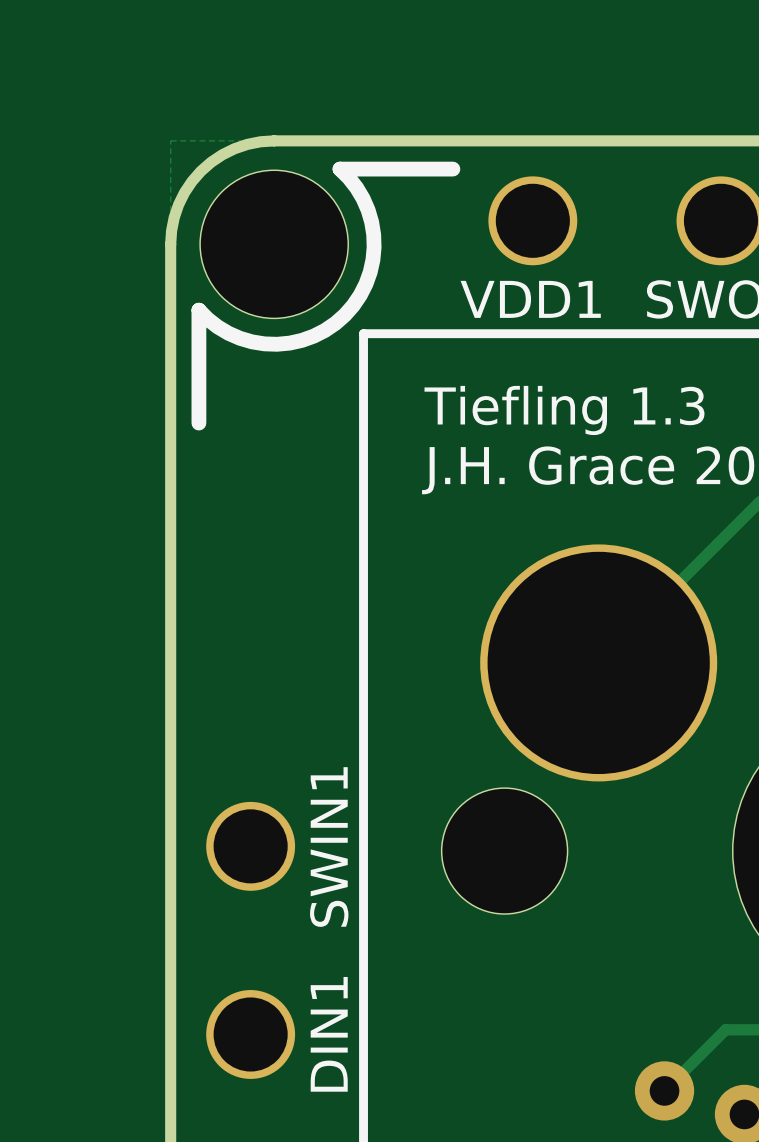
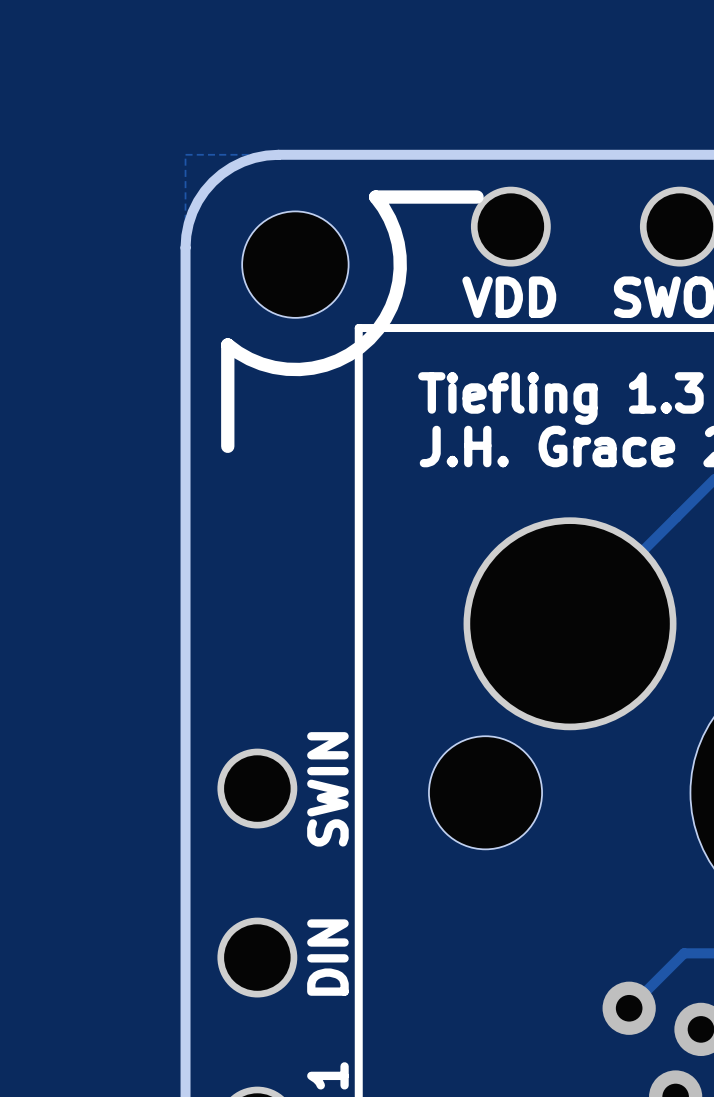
line: (452, 169) (340, 169) (356, 187) (363, 198) (371, 222) (373, 234) (372, 259) (370, 272) (360, 295) (344, 315) (325, 330) (301, 340) (277, 344) (252, 341) (228, 333) (217, 326) (198, 310) (198, 423) -> none
part footprint: [200, 170, 349, 319] -> [242, 211, 349, 318]
line: none -> (477, 197) (375, 197) (389, 218) (394, 230) (399, 256) (400, 269) (395, 294) (385, 318) (378, 329) (359, 347) (337, 360) (312, 368) (286, 369) (261, 363) (238, 352) (227, 344) (227, 446)
VDD1 name: VDD1 (530, 299) -> VDD (509, 297)
SWIN1 name: SWIN1 (329, 847) -> SWIN (327, 789)
DIN1 name: DIN1 (329, 1034) -> DIN (327, 957)

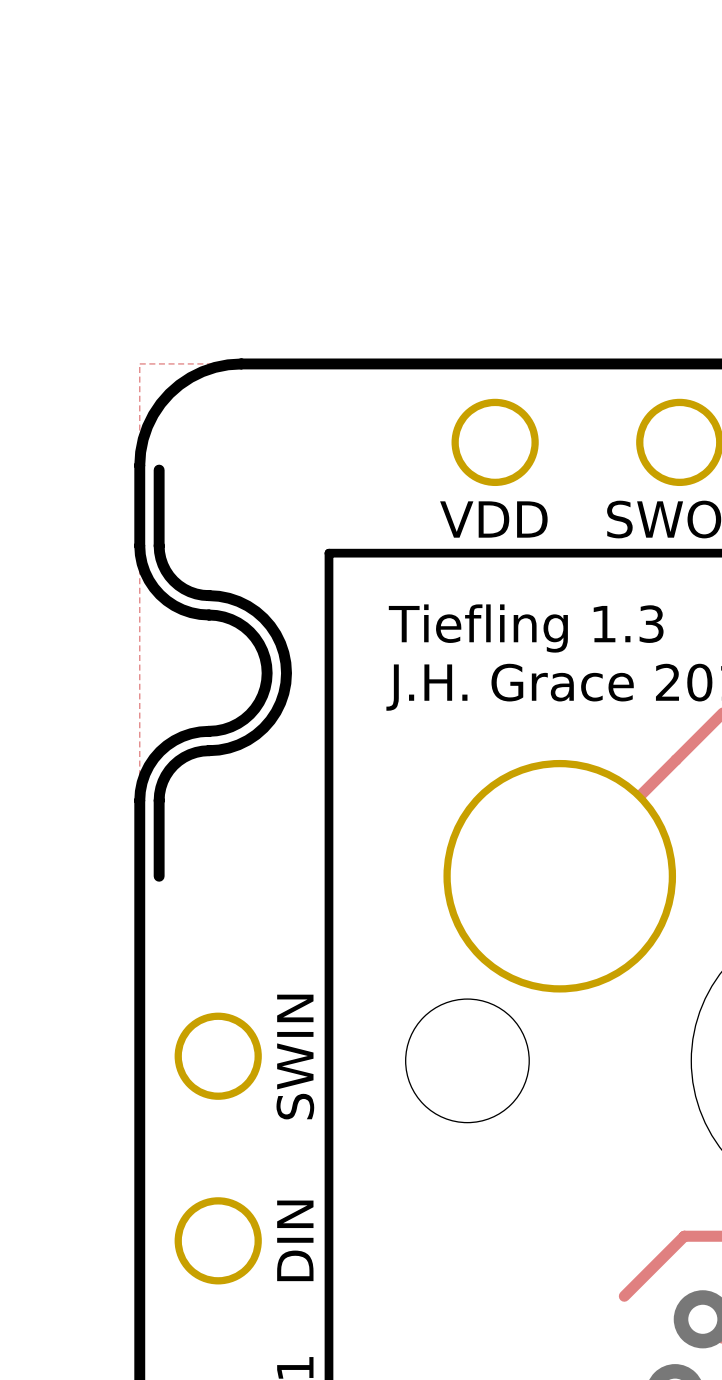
line: (477, 197) (375, 197) (389, 218) (394, 230) (399, 256) (400, 269) (395, 294) (385, 318) (378, 329) (359, 347) (337, 360) (312, 368) (286, 369) (261, 363) (238, 352) (227, 344) (227, 446) -> none
drawing: none -> [153, 464, 292, 882]
part: (295, 264) -> none
board edge: (185, 321) (185, 554) -> (139, 545) (145, 572) (160, 594) (182, 609) (199, 614) (224, 617) (244, 627) (259, 644) (265, 658) (267, 673) (265, 688) (259, 702) (244, 719) (224, 729) (199, 731) (182, 736) (160, 751) (145, 774) (139, 800)
via: (629, 1008) -> none

